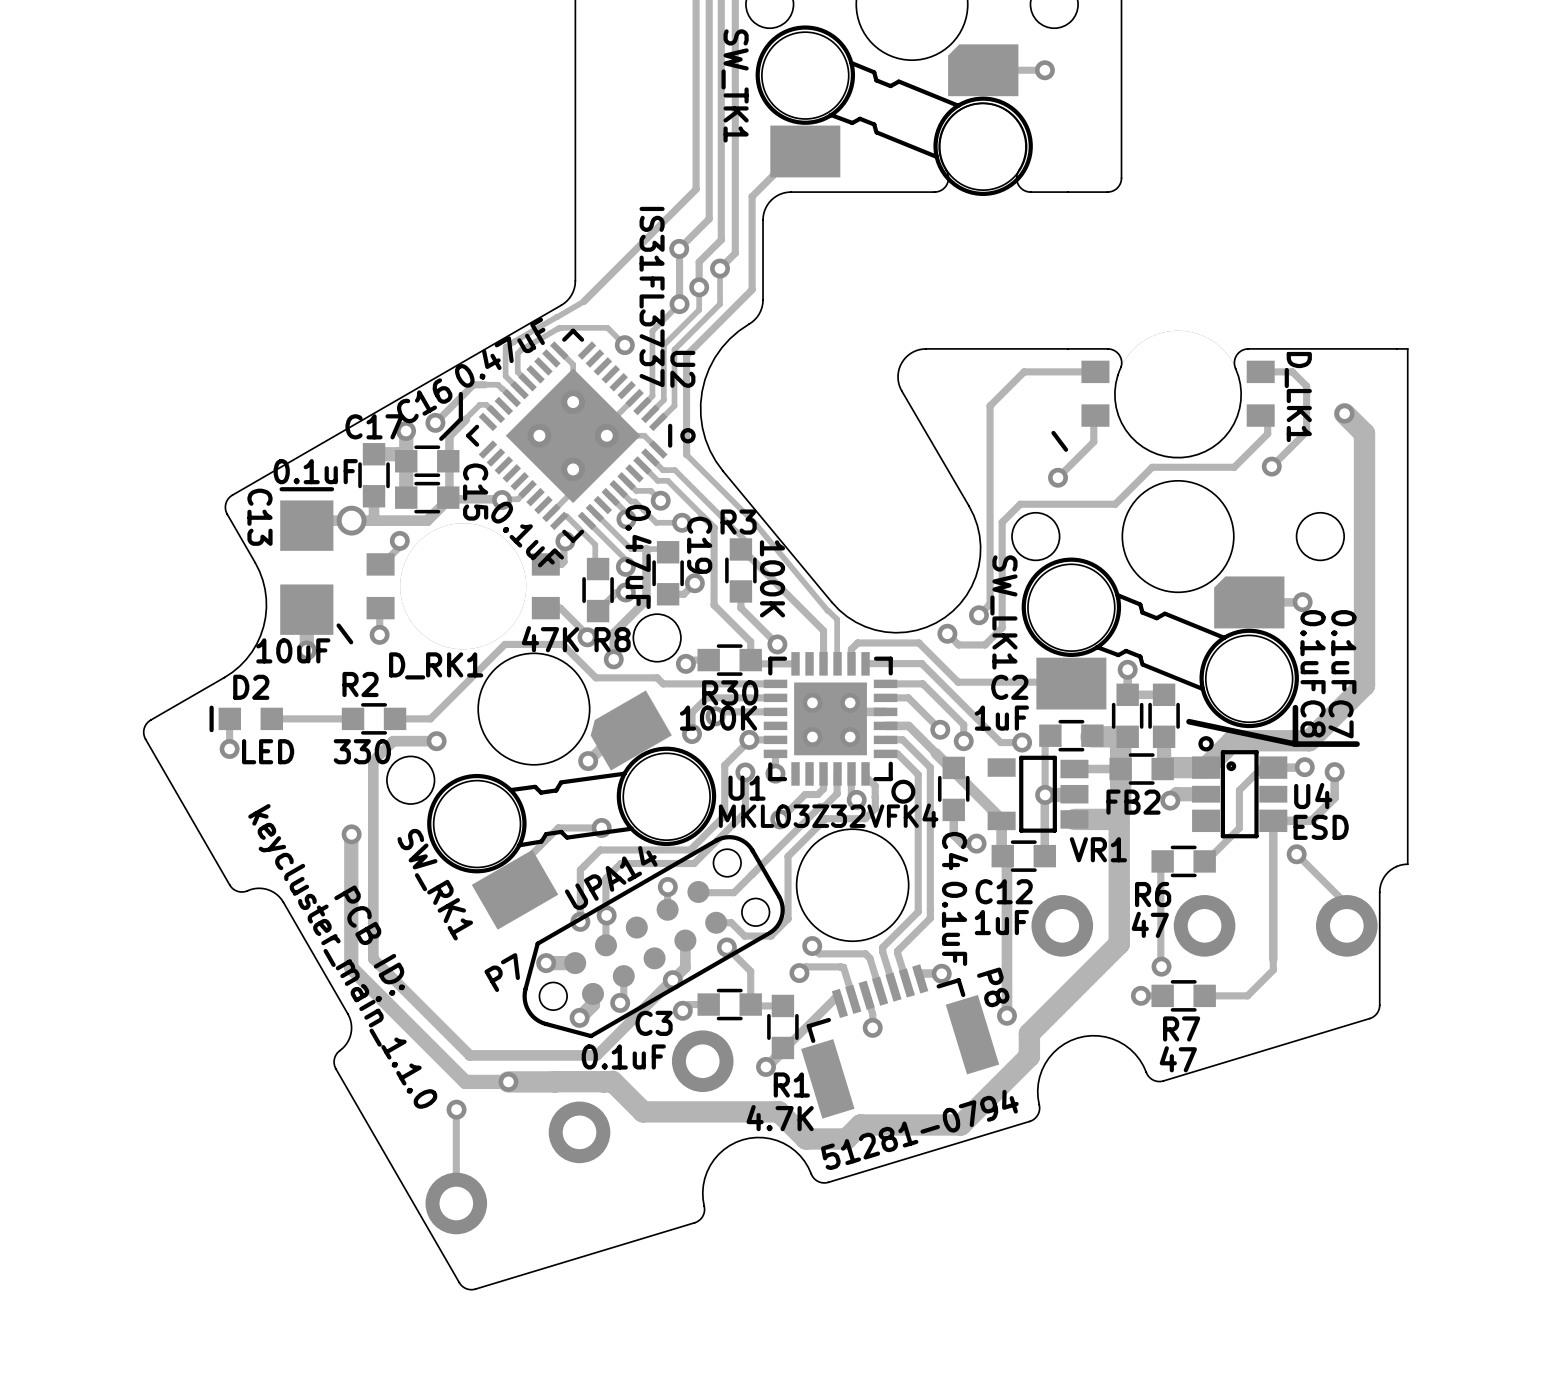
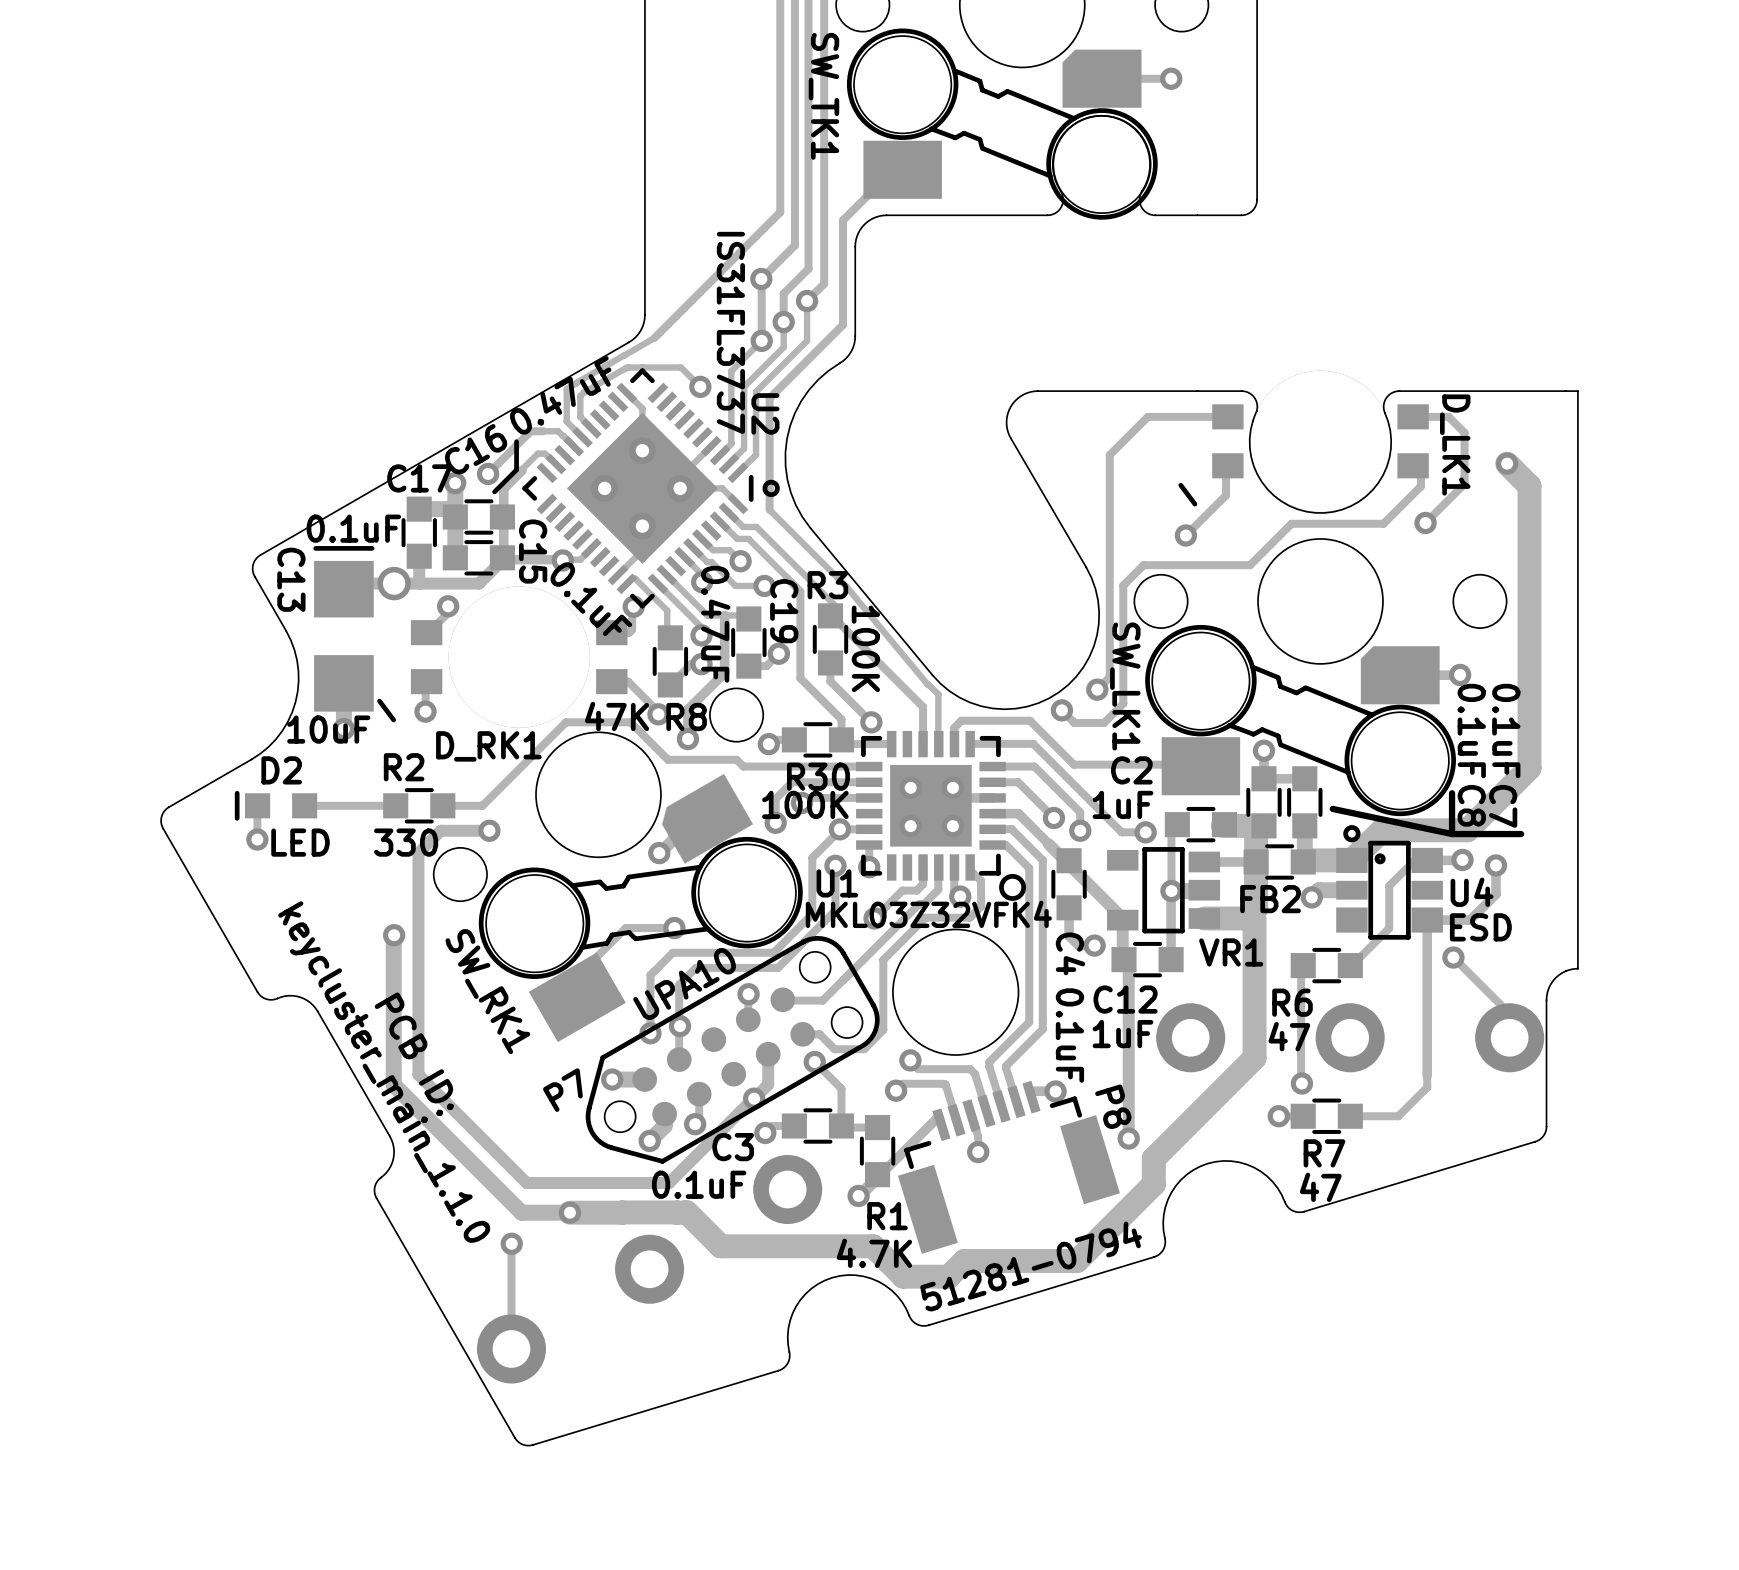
text: UPA14 (611, 877) -> UPA10 (684, 983)

